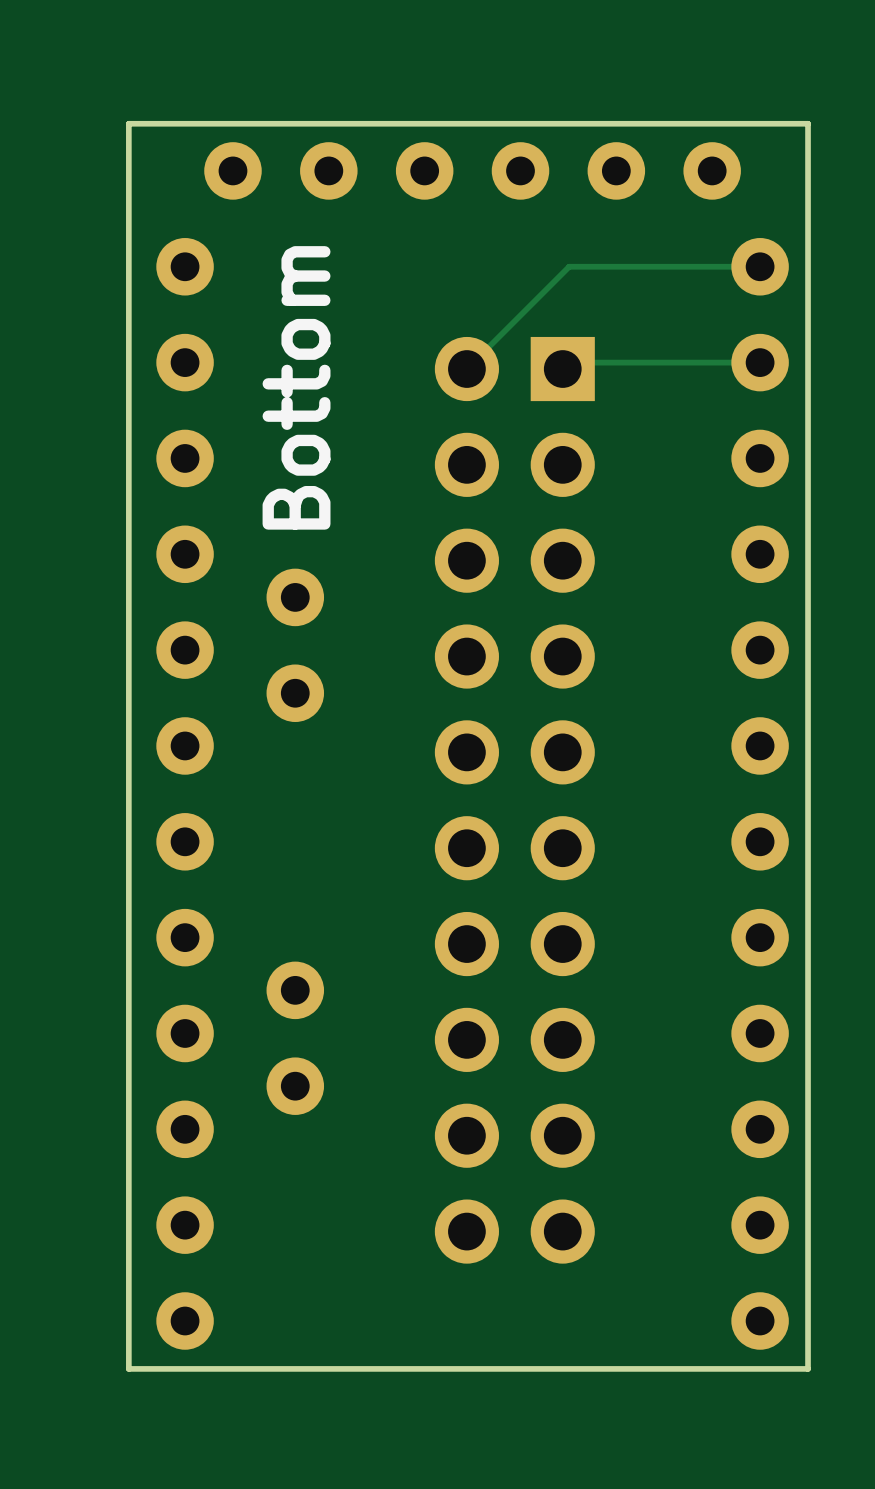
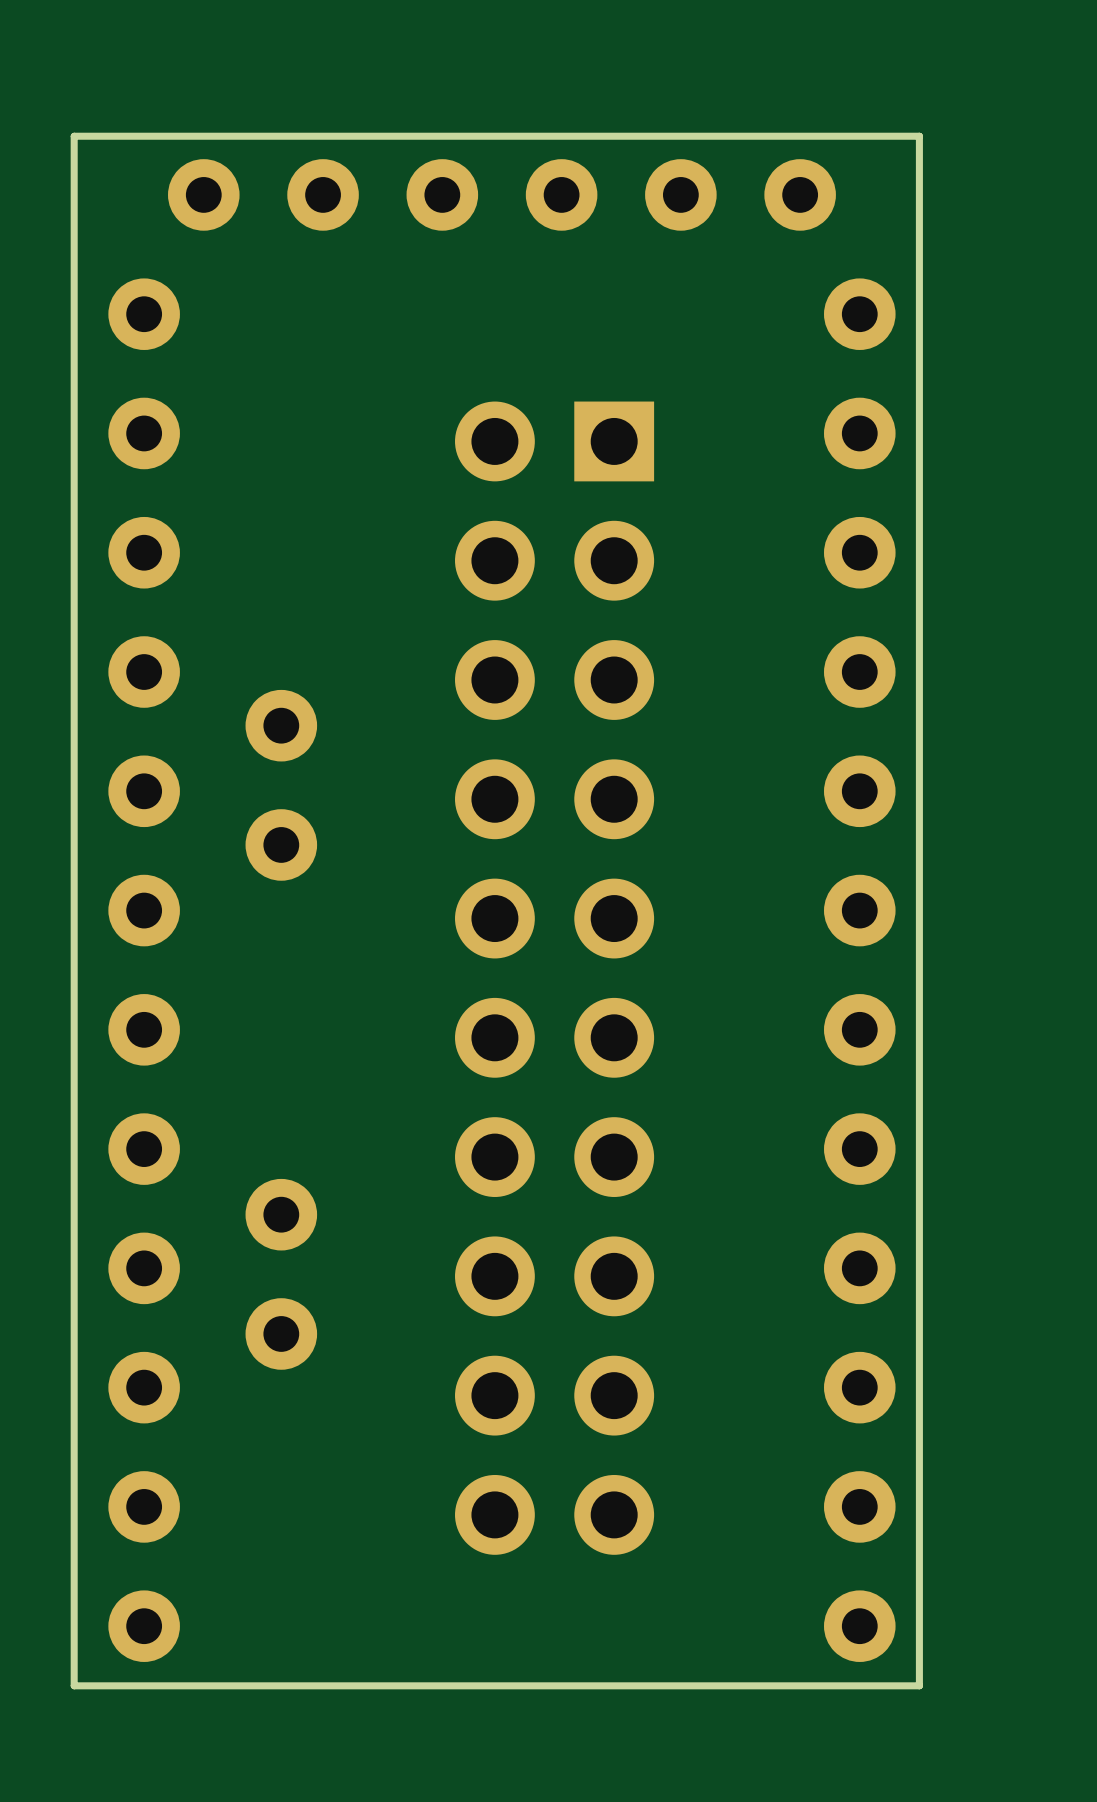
track: (760, 266) (569, 266) (466, 369) -> none
track: (760, 362) (569, 362) (562, 369) -> none
text: Bottom (296, 387) -> none

